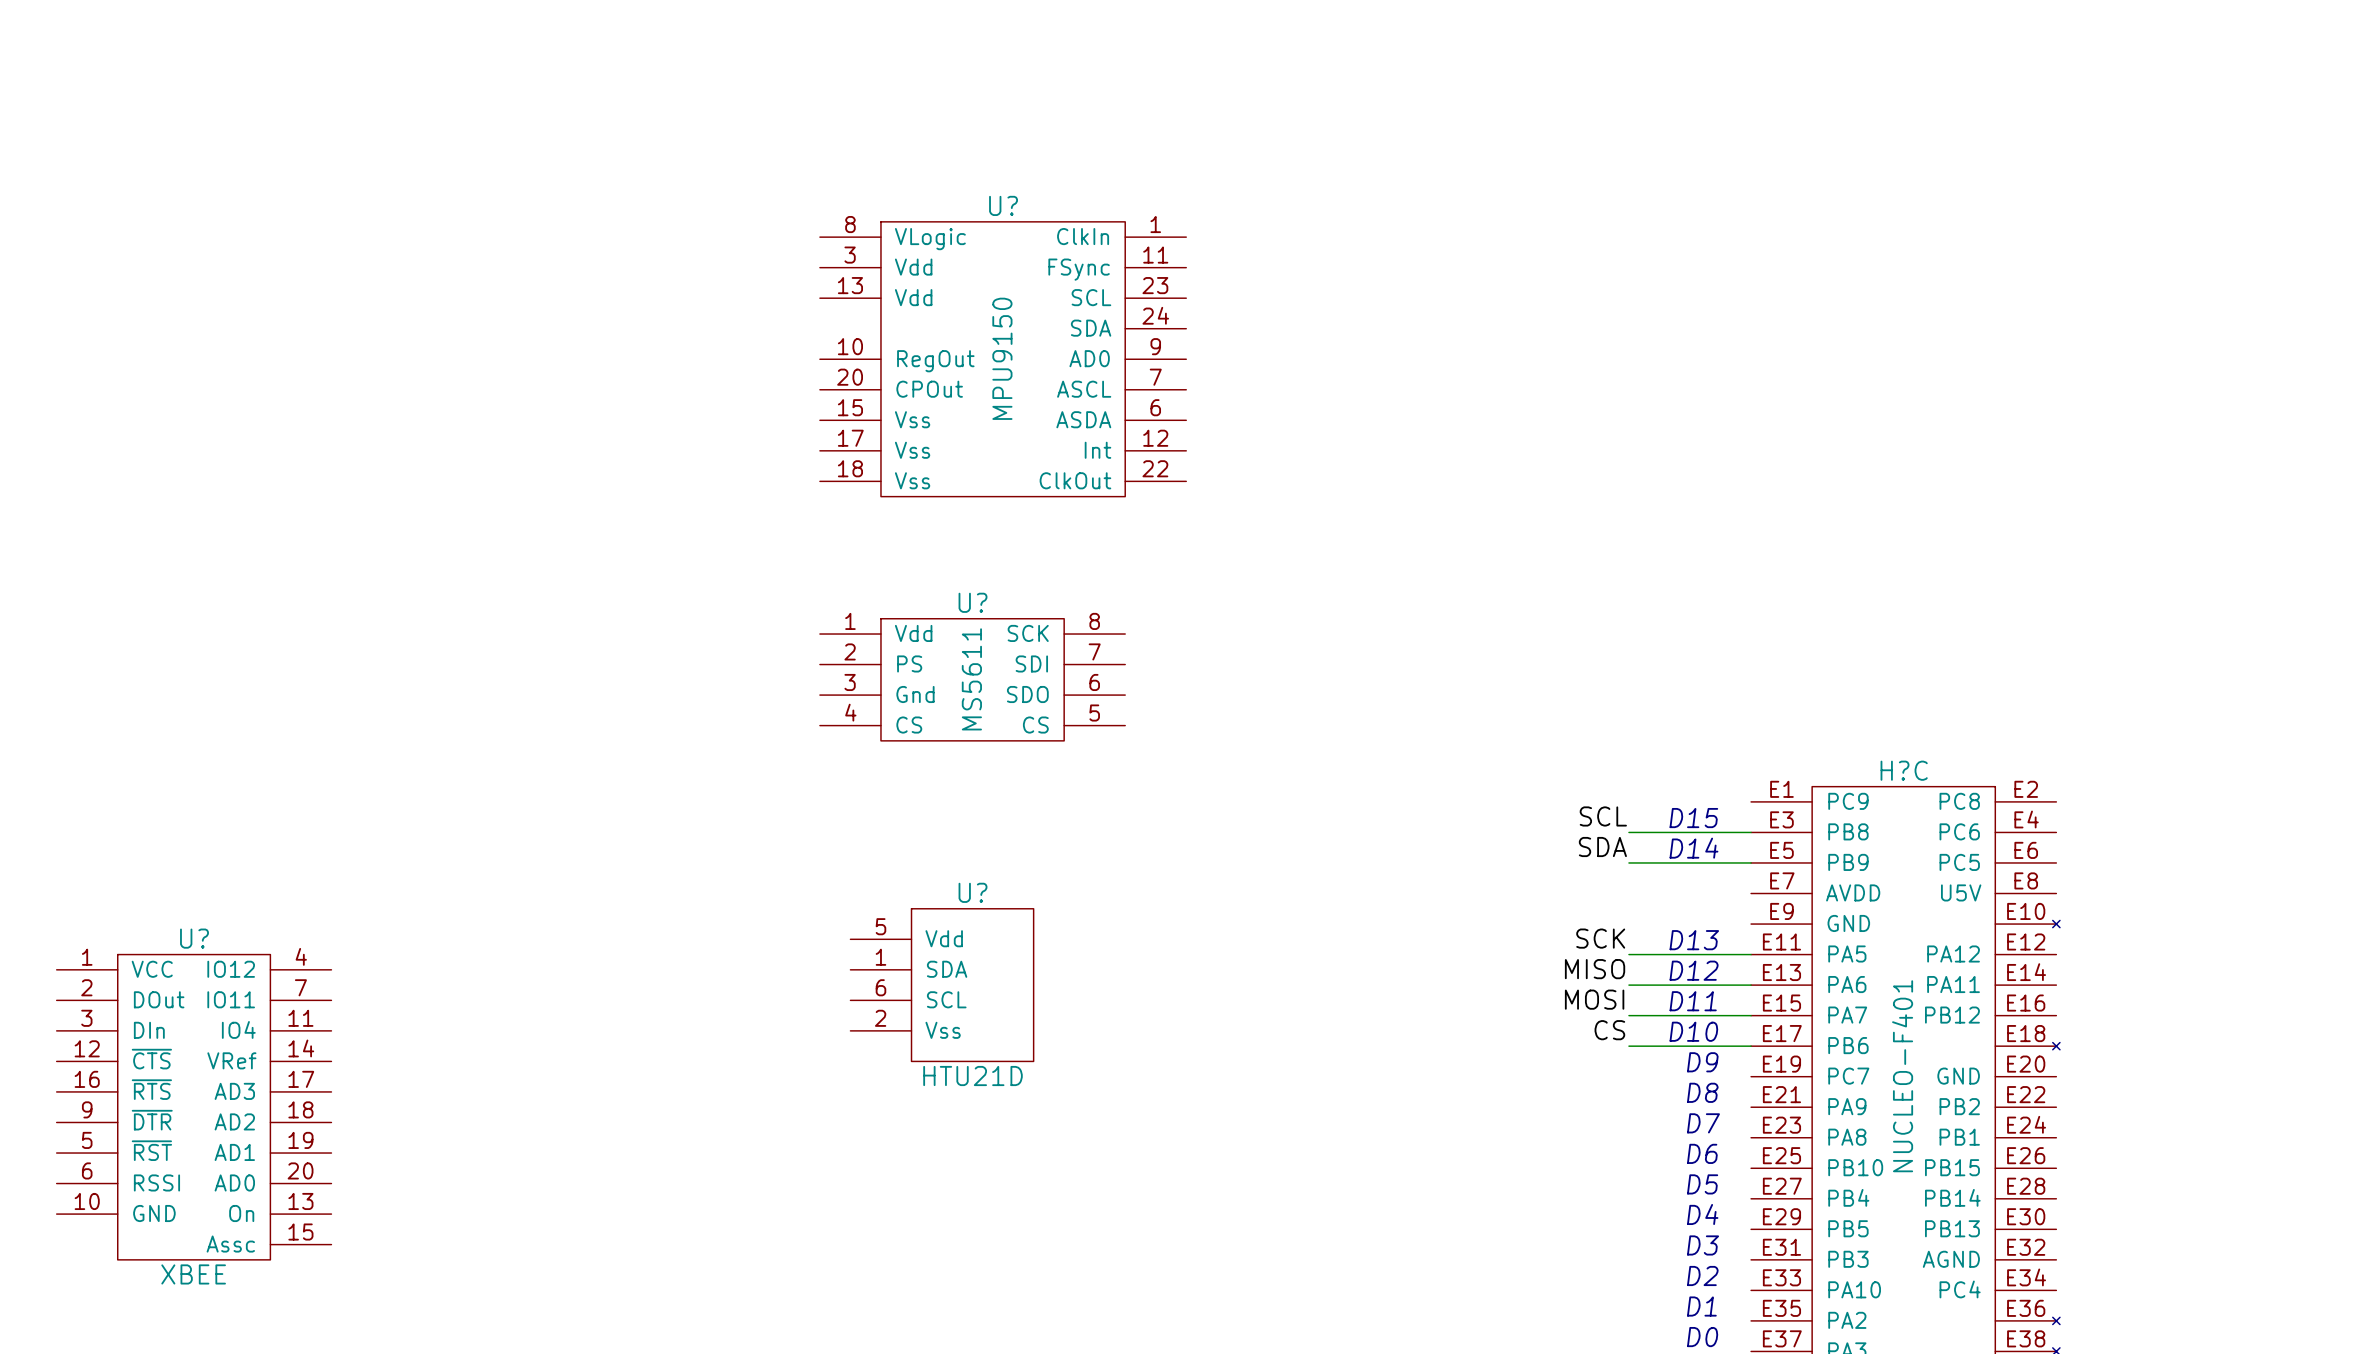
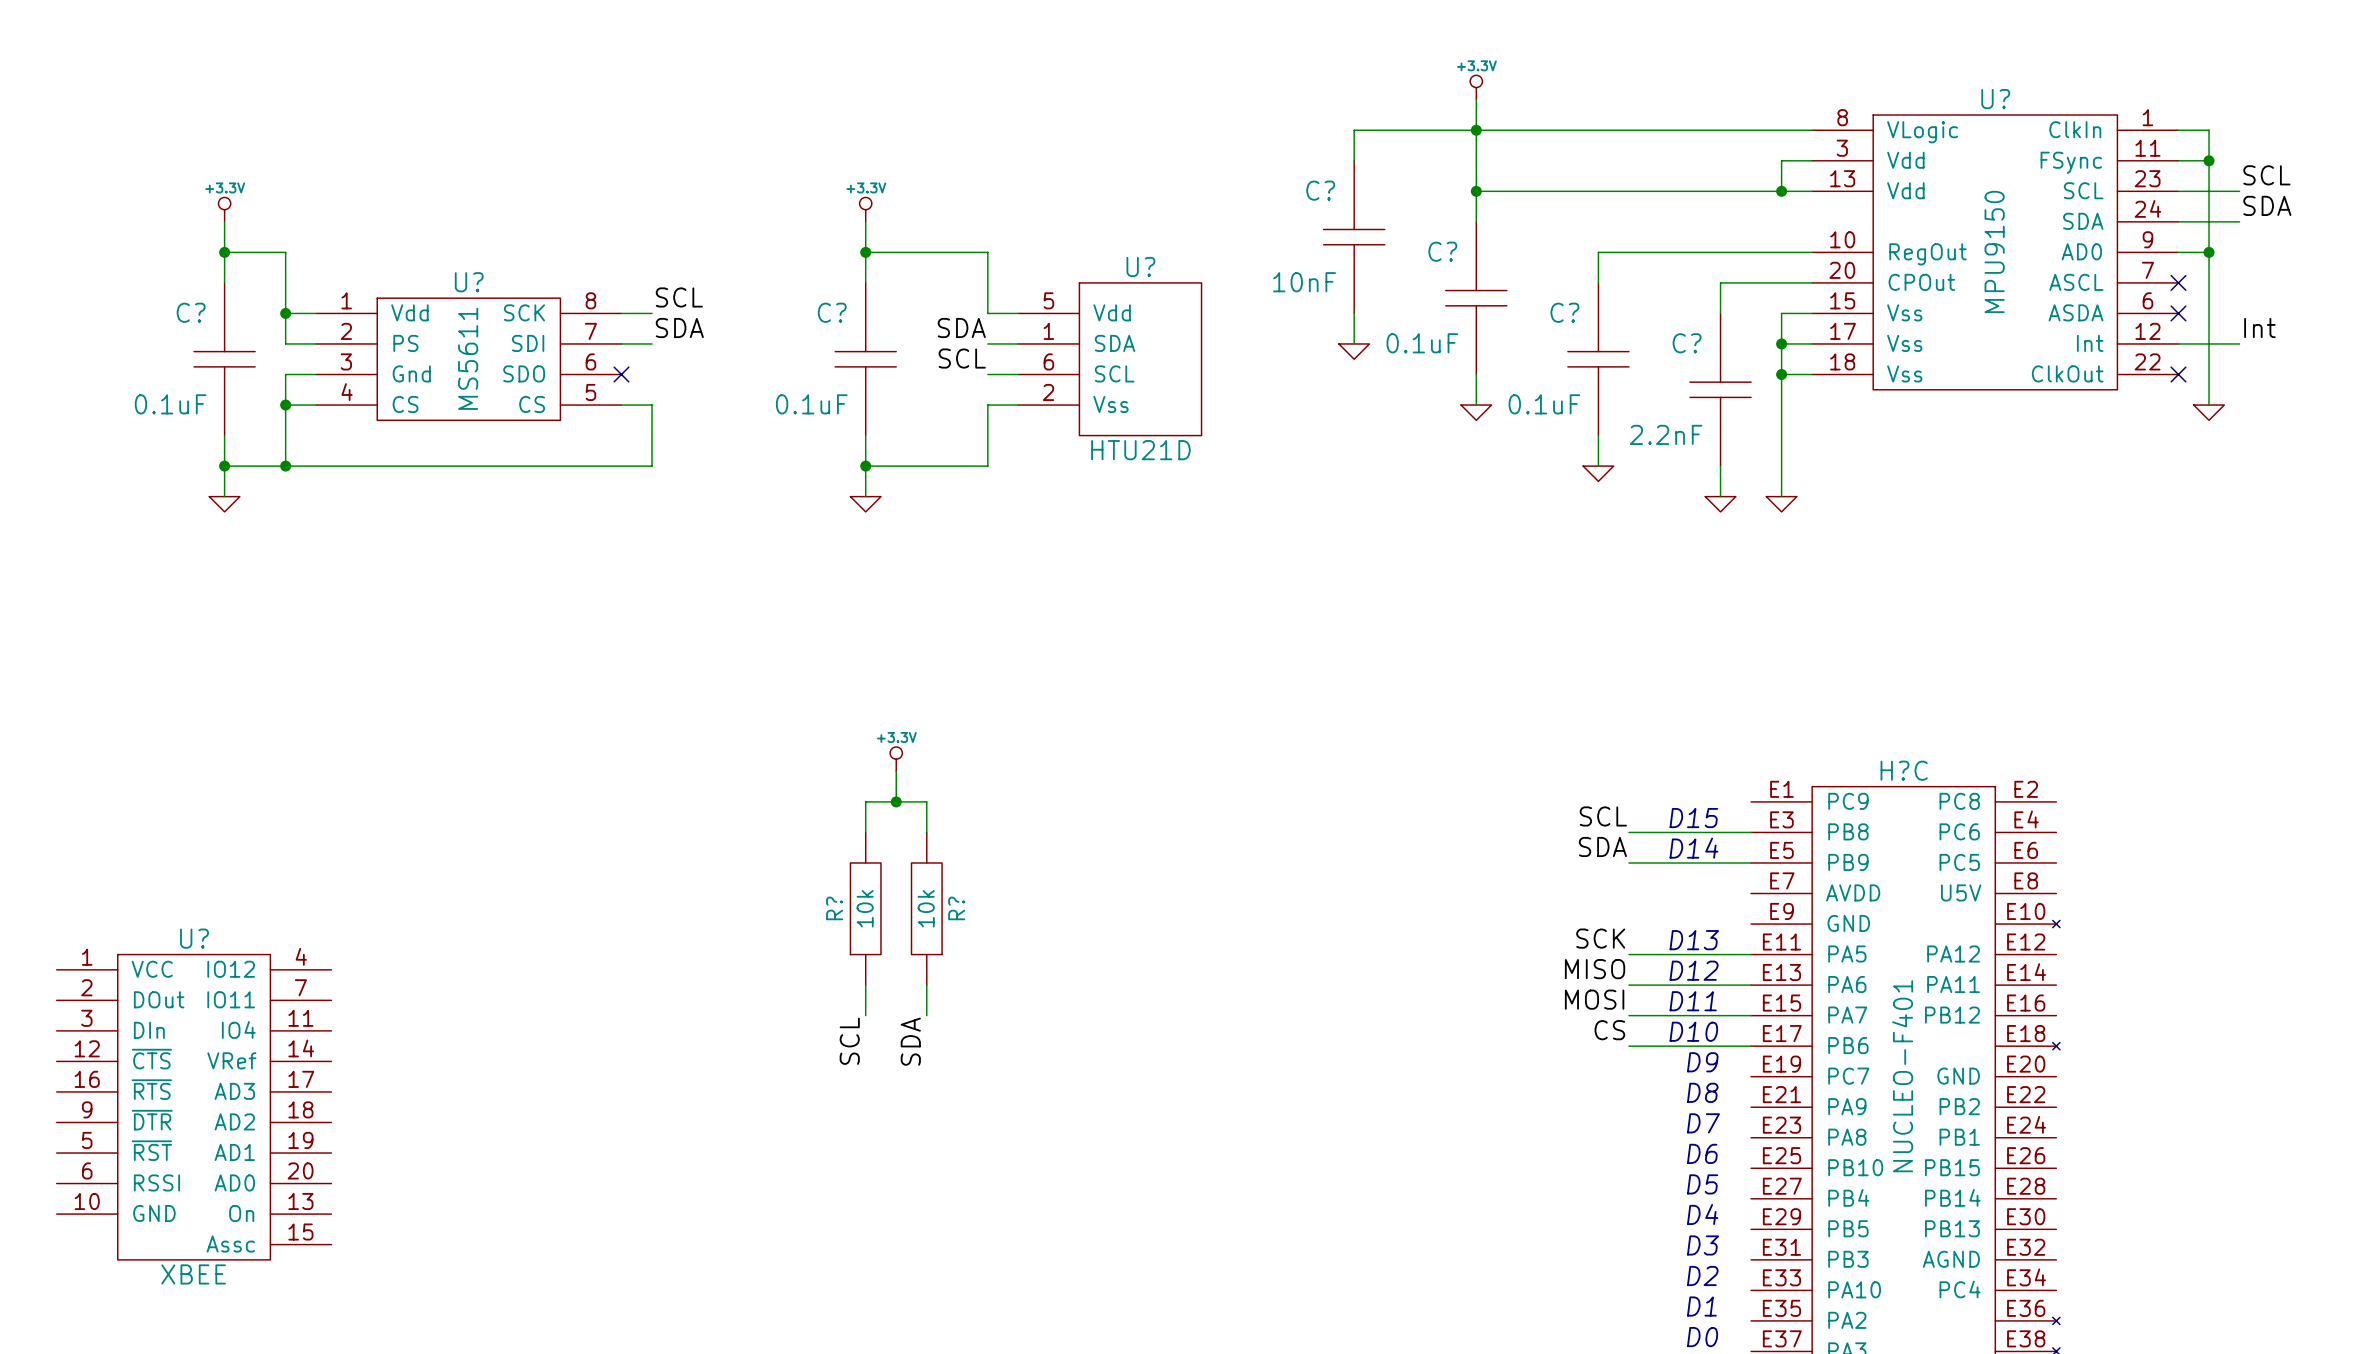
power symbol: none -> +3.3V (1476, 87)
wire: none -> (1476, 99) (1476, 221)
junction: none -> (1476, 130)
wire: none -> (1812, 130) (1354, 130) (1354, 160)
wire: none -> (2178, 130) (2209, 130) (2209, 405)
wire: none -> (1812, 160) (1781, 160) (1781, 191)
wire: none -> (2178, 160) (2209, 160)
junction: none -> (2209, 160)
label: none -> SCL (2266, 175)
wire: none -> (1476, 191) (1812, 191)
junction: none -> (1476, 191)
junction: none -> (1781, 191)
wire: none -> (2178, 191) (2239, 191)
label: none -> SDA (2267, 205)
power symbol: none -> +3.3V (224, 209)
power symbol: none -> +3.3V (865, 209)
wire: none -> (224, 221) (224, 282)
wire: none -> (865, 221) (865, 282)
wire: none -> (2178, 221) (2239, 221)
C?: none -> 10nF (1354, 237)
wire: none -> (224, 252) (285, 252) (285, 343) (316, 343)
junction: none -> (224, 252)
wire: none -> (865, 252) (987, 252) (987, 313) (1018, 313)
junction: none -> (865, 252)
wire: none -> (1812, 252) (1598, 252) (1598, 282)
U?: none -> MPU9150 (1995, 252)
wire: none -> (2178, 252) (2209, 252)
junction: none -> (2209, 252)
wire: none -> (1812, 282) (1720, 282) (1720, 313)
no-connect mark: none -> (2178, 282)
label: none -> SCL (679, 297)
C?: none -> 0.1uF (1476, 298)
wire: none -> (285, 313) (316, 313)
junction: none -> (285, 313)
wire: none -> (621, 313) (652, 313)
wire: none -> (1354, 313) (1354, 343)
wire: none -> (1812, 313) (1781, 313) (1781, 496)
no-connect mark: none -> (2178, 313)
label: none -> SDA (679, 328)
label: none -> SDA (961, 328)
label: none -> Int (2259, 328)
wire: none -> (621, 343) (652, 343)
wire: none -> (987, 343) (1018, 343)
wire: none -> (1781, 343) (1812, 343)
junction: none -> (1781, 343)
wire: none -> (2178, 343) (2239, 343)
power symbol: none -> (1354, 351)
label: none -> SCL (962, 358)
C?: none -> 0.1uF (224, 359)
U?: none -> MS5611 (468, 359)
C?: none -> 0.1uF (865, 359)
U?: MPU9150 (1003, 359) -> none
U?: none -> HTU21D (1109, 359)
C?: none -> 0.1uF (1598, 359)
wire: none -> (316, 374) (285, 374) (285, 466)
no-connect mark: none -> (621, 374)
wire: none -> (987, 374) (1018, 374)
wire: none -> (1476, 374) (1476, 405)
wire: none -> (1781, 374) (1812, 374)
junction: none -> (1781, 374)
no-connect mark: none -> (2178, 374)
C?: none -> 2.2nF (1720, 389)
wire: none -> (285, 405) (316, 405)
junction: none -> (285, 405)
wire: none -> (621, 405) (652, 405) (652, 466) (224, 466)
wire: none -> (1018, 405) (987, 405) (987, 466) (865, 466)
power symbol: none -> (1476, 412)
power symbol: none -> (2209, 412)
wire: none -> (224, 435) (224, 496)
wire: none -> (865, 435) (865, 496)
wire: none -> (1598, 435) (1598, 466)
junction: none -> (224, 466)
junction: none -> (285, 466)
junction: none -> (865, 466)
wire: none -> (1720, 466) (1720, 496)
power symbol: none -> (1598, 473)
power symbol: none -> (224, 504)
power symbol: none -> (865, 504)
power symbol: none -> (1720, 504)
power symbol: none -> (1781, 504)
U?: MS5611 (972, 679) -> none
power symbol: none -> +3.3V (896, 759)
wire: none -> (896, 771) (896, 801)
junction: none -> (896, 801)
wire: none -> (865, 832) (865, 801) (926, 801) (926, 832)
R?: none -> 10k (865, 908)
R?: none -> 10k (926, 908)
wire: none -> (865, 985) (865, 1015)
wire: none -> (926, 985) (926, 1015)
U?: HTU21D (942, 985) -> none
label: none -> SCL (849, 1041)
label: none -> SDA (910, 1041)

